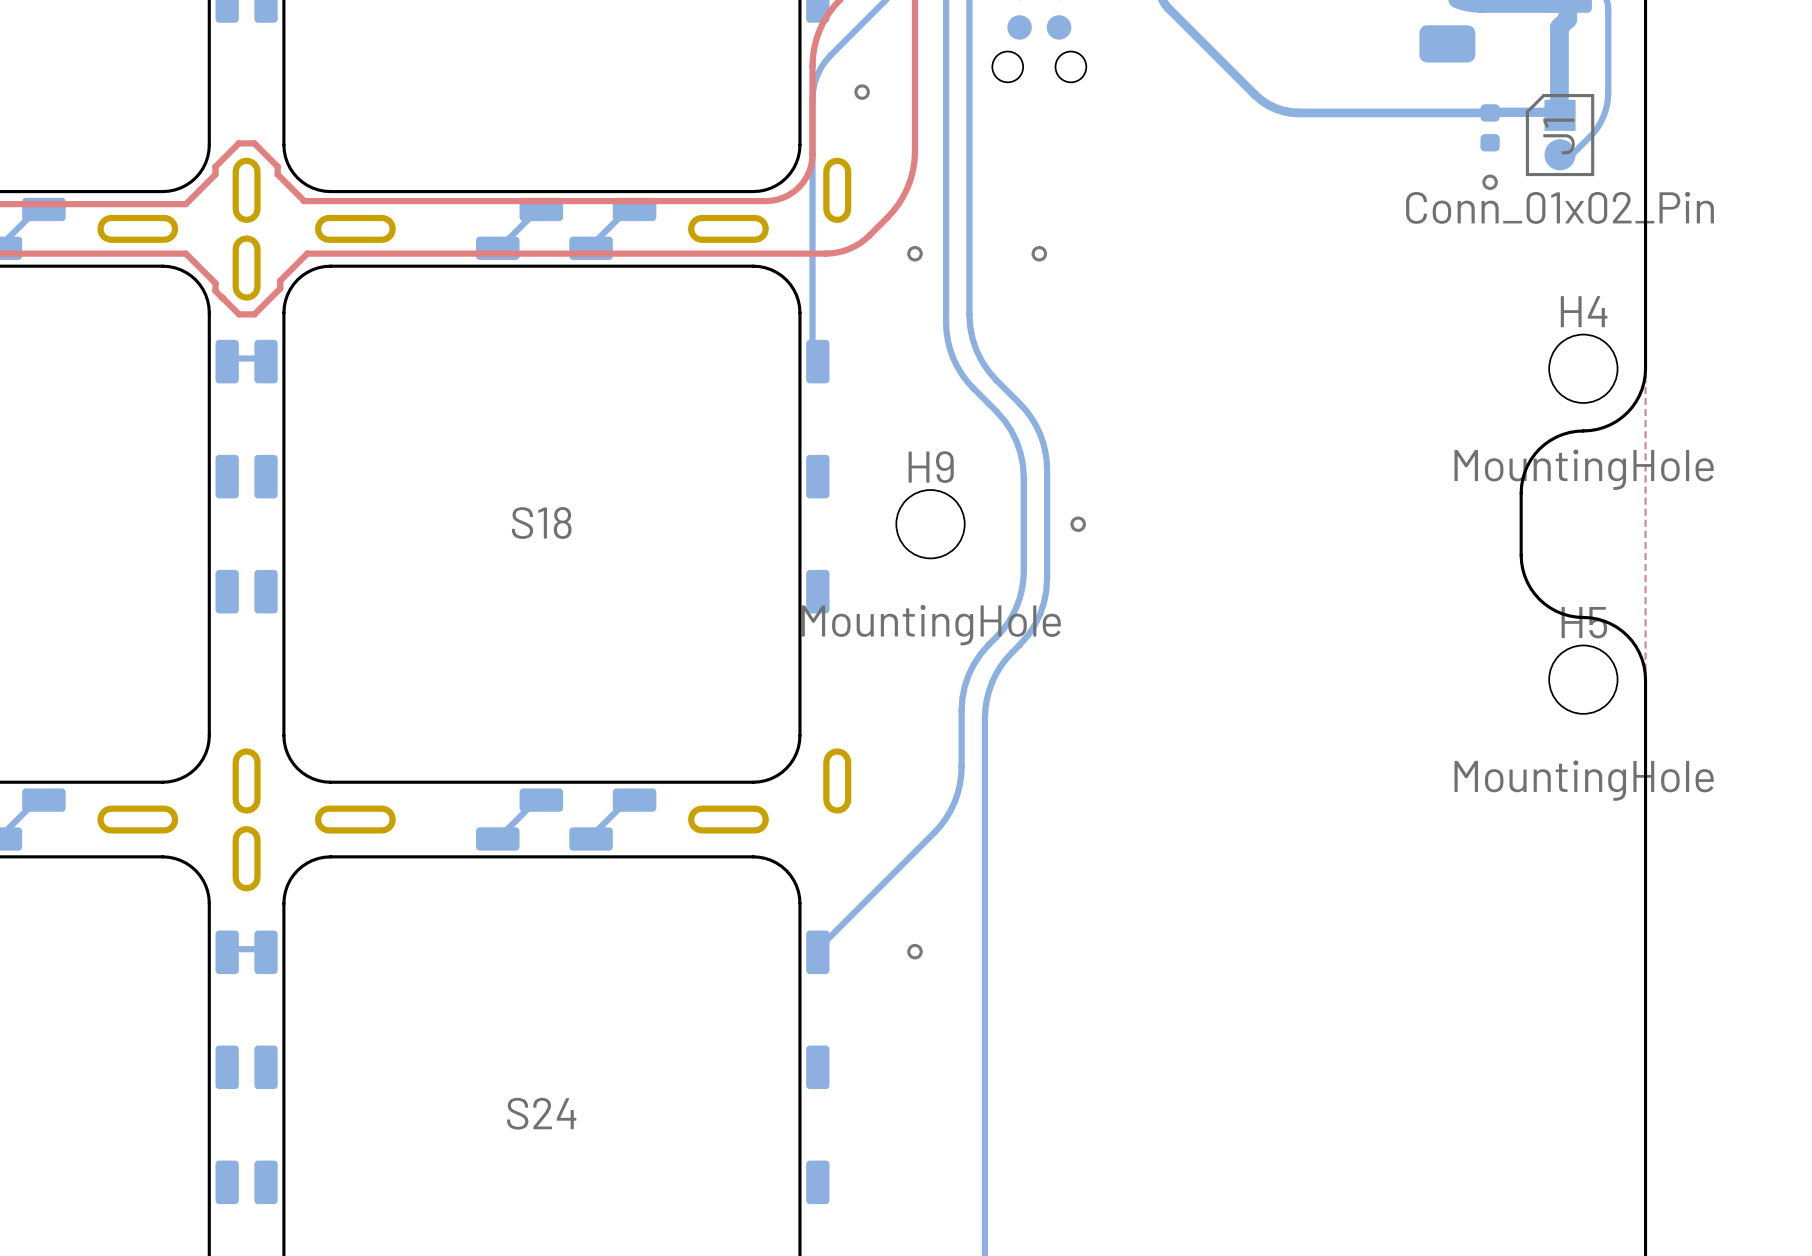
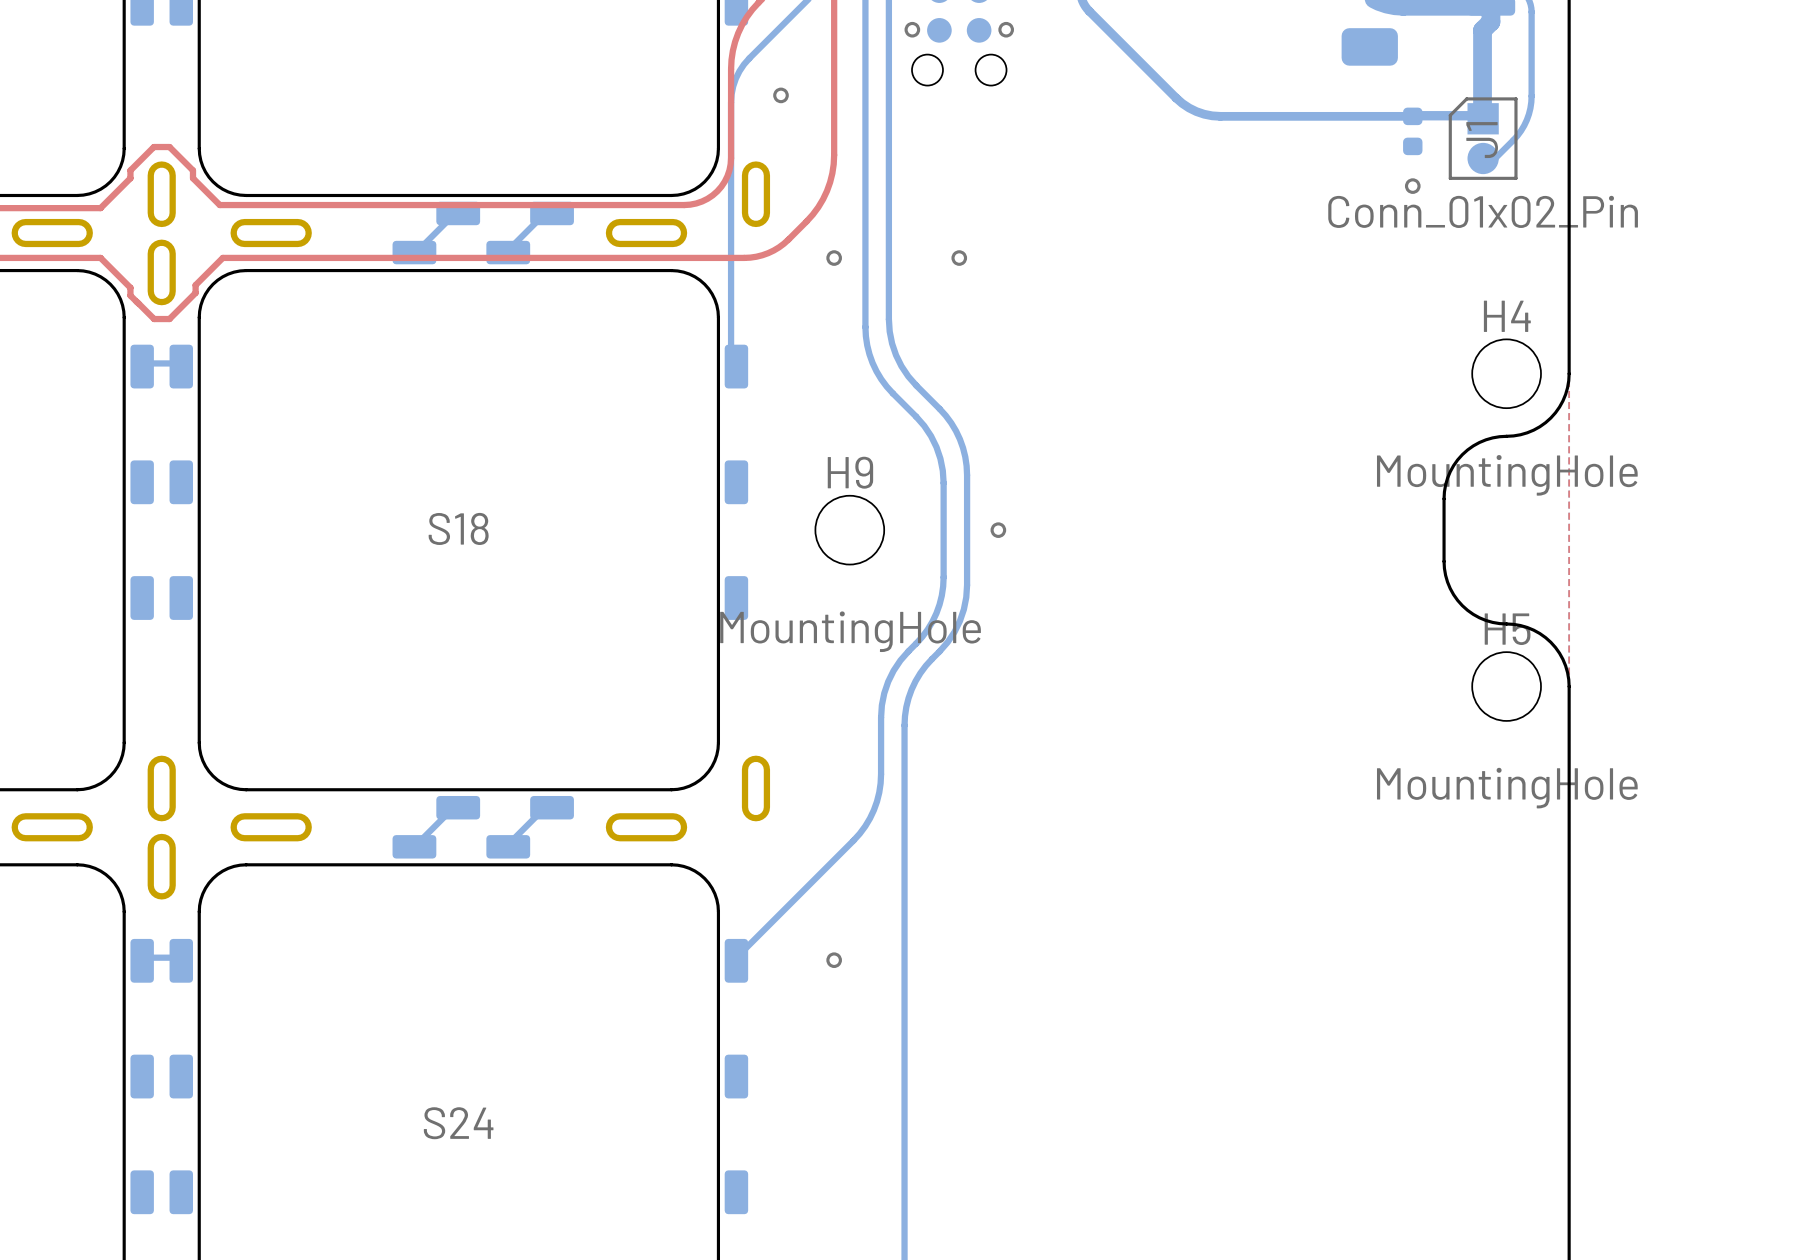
via: none -> (912, 29)
via: none -> (1006, 29)

